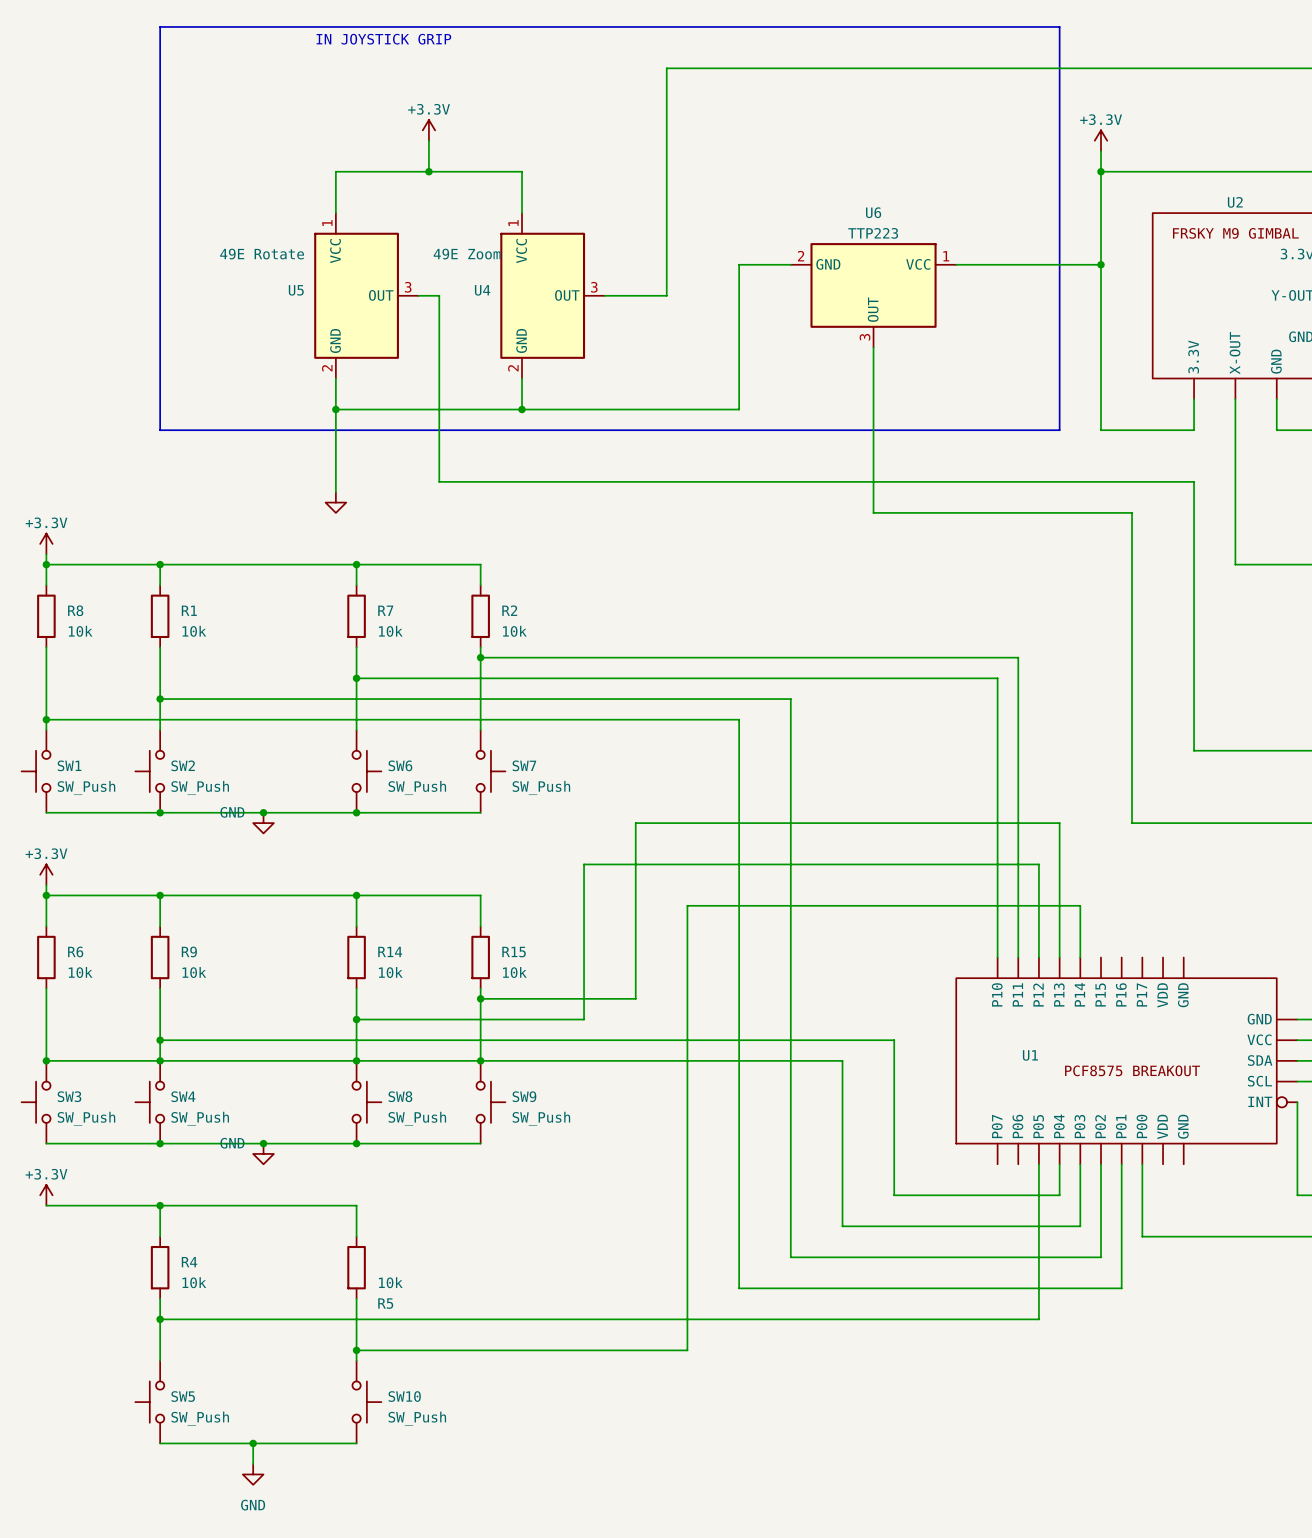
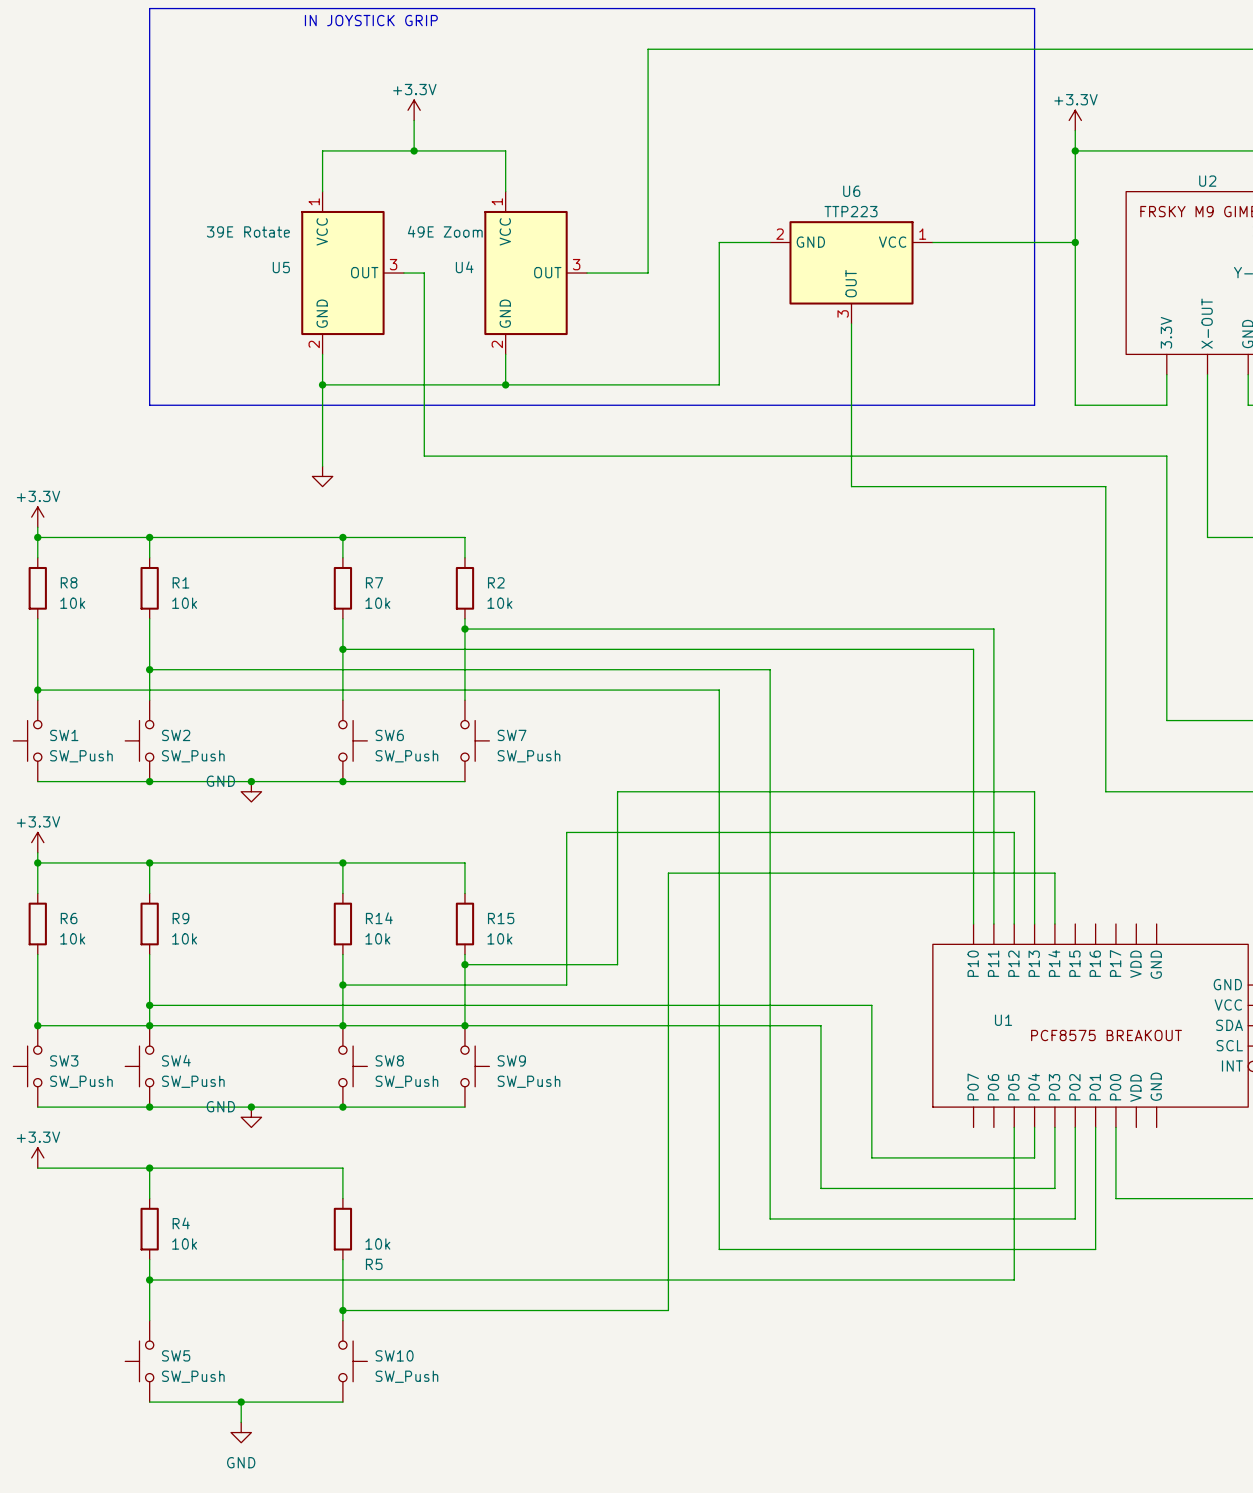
U5 value: 49E Rotate (262, 254) -> 39E Rotate (248, 231)

